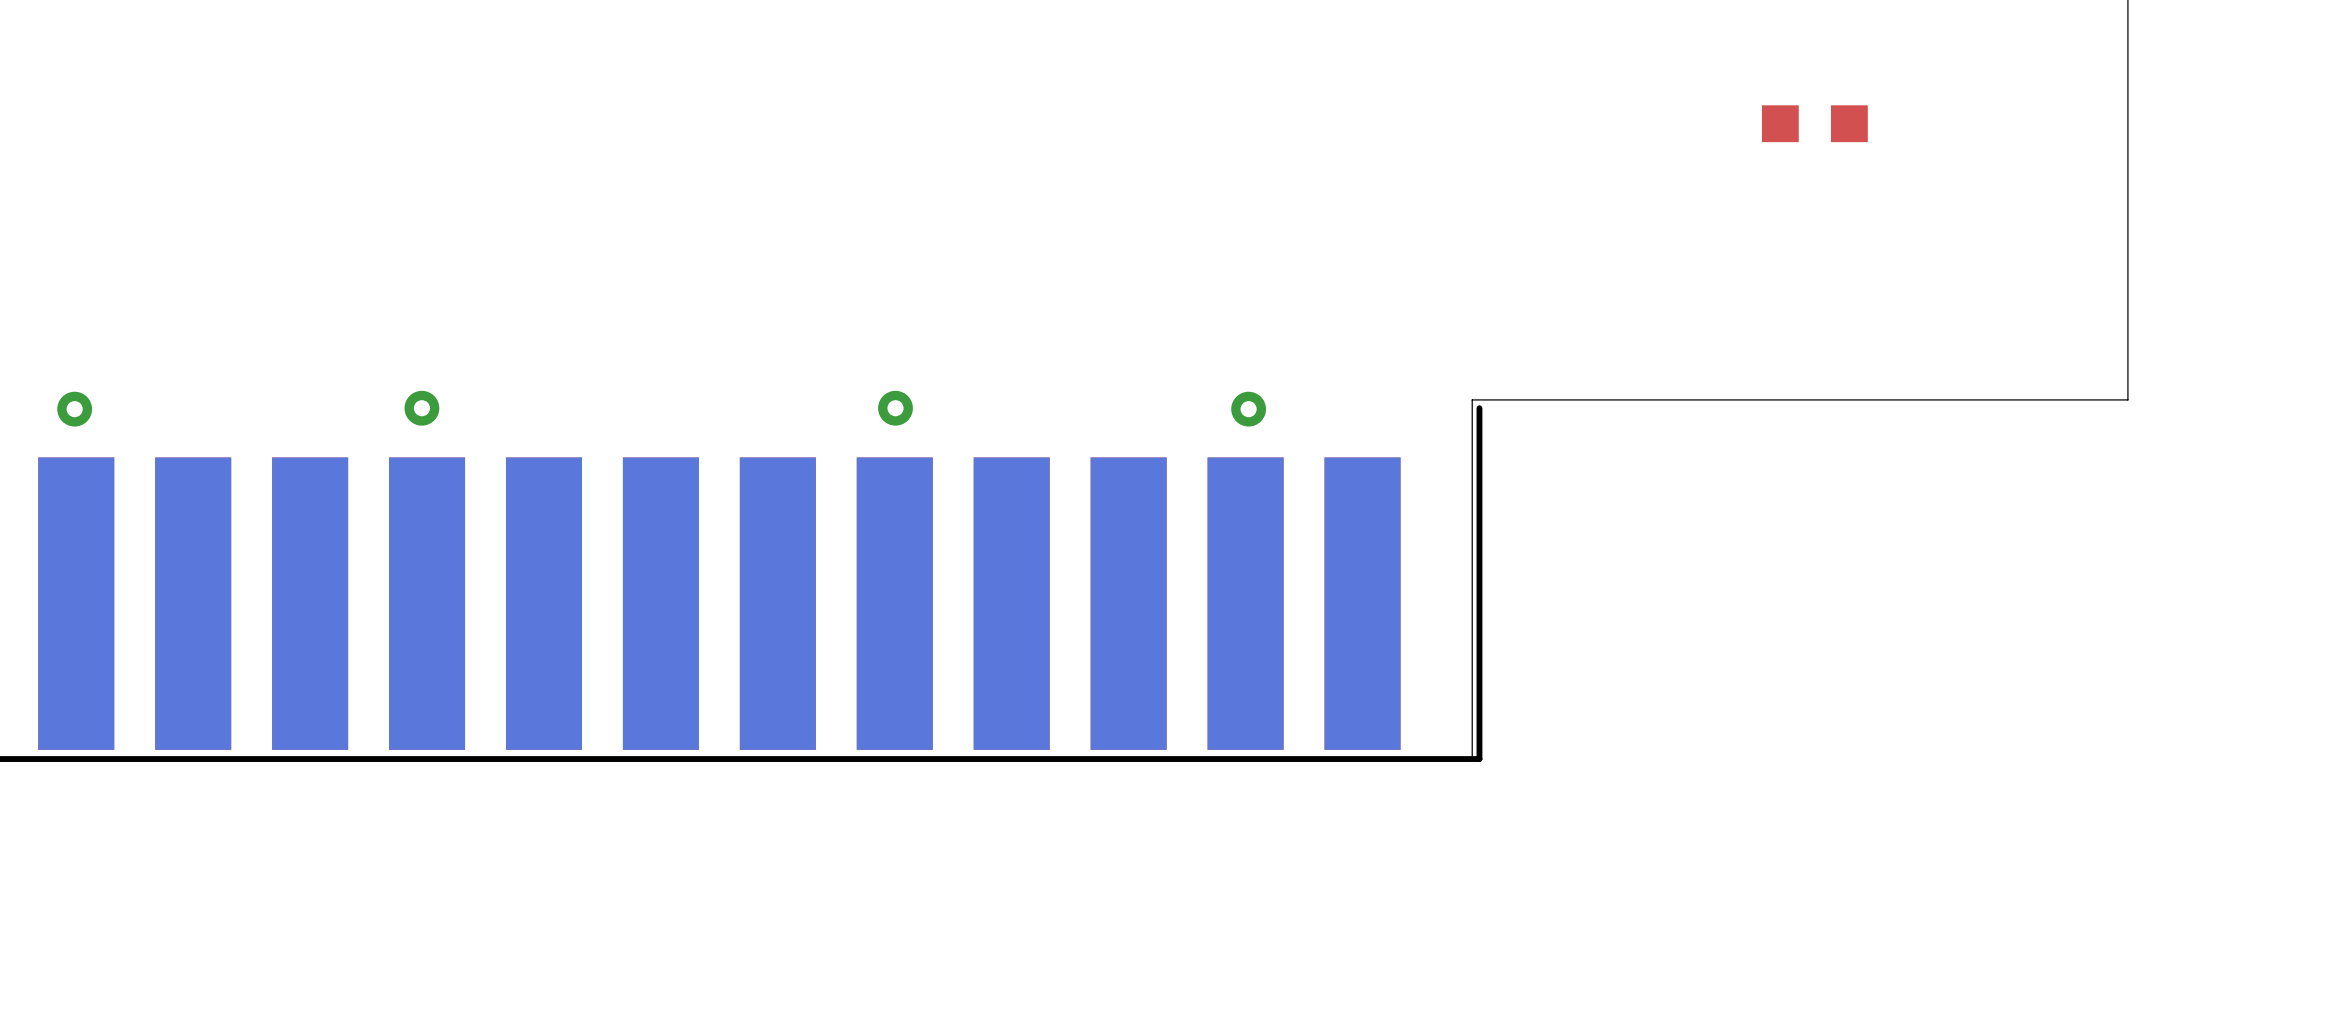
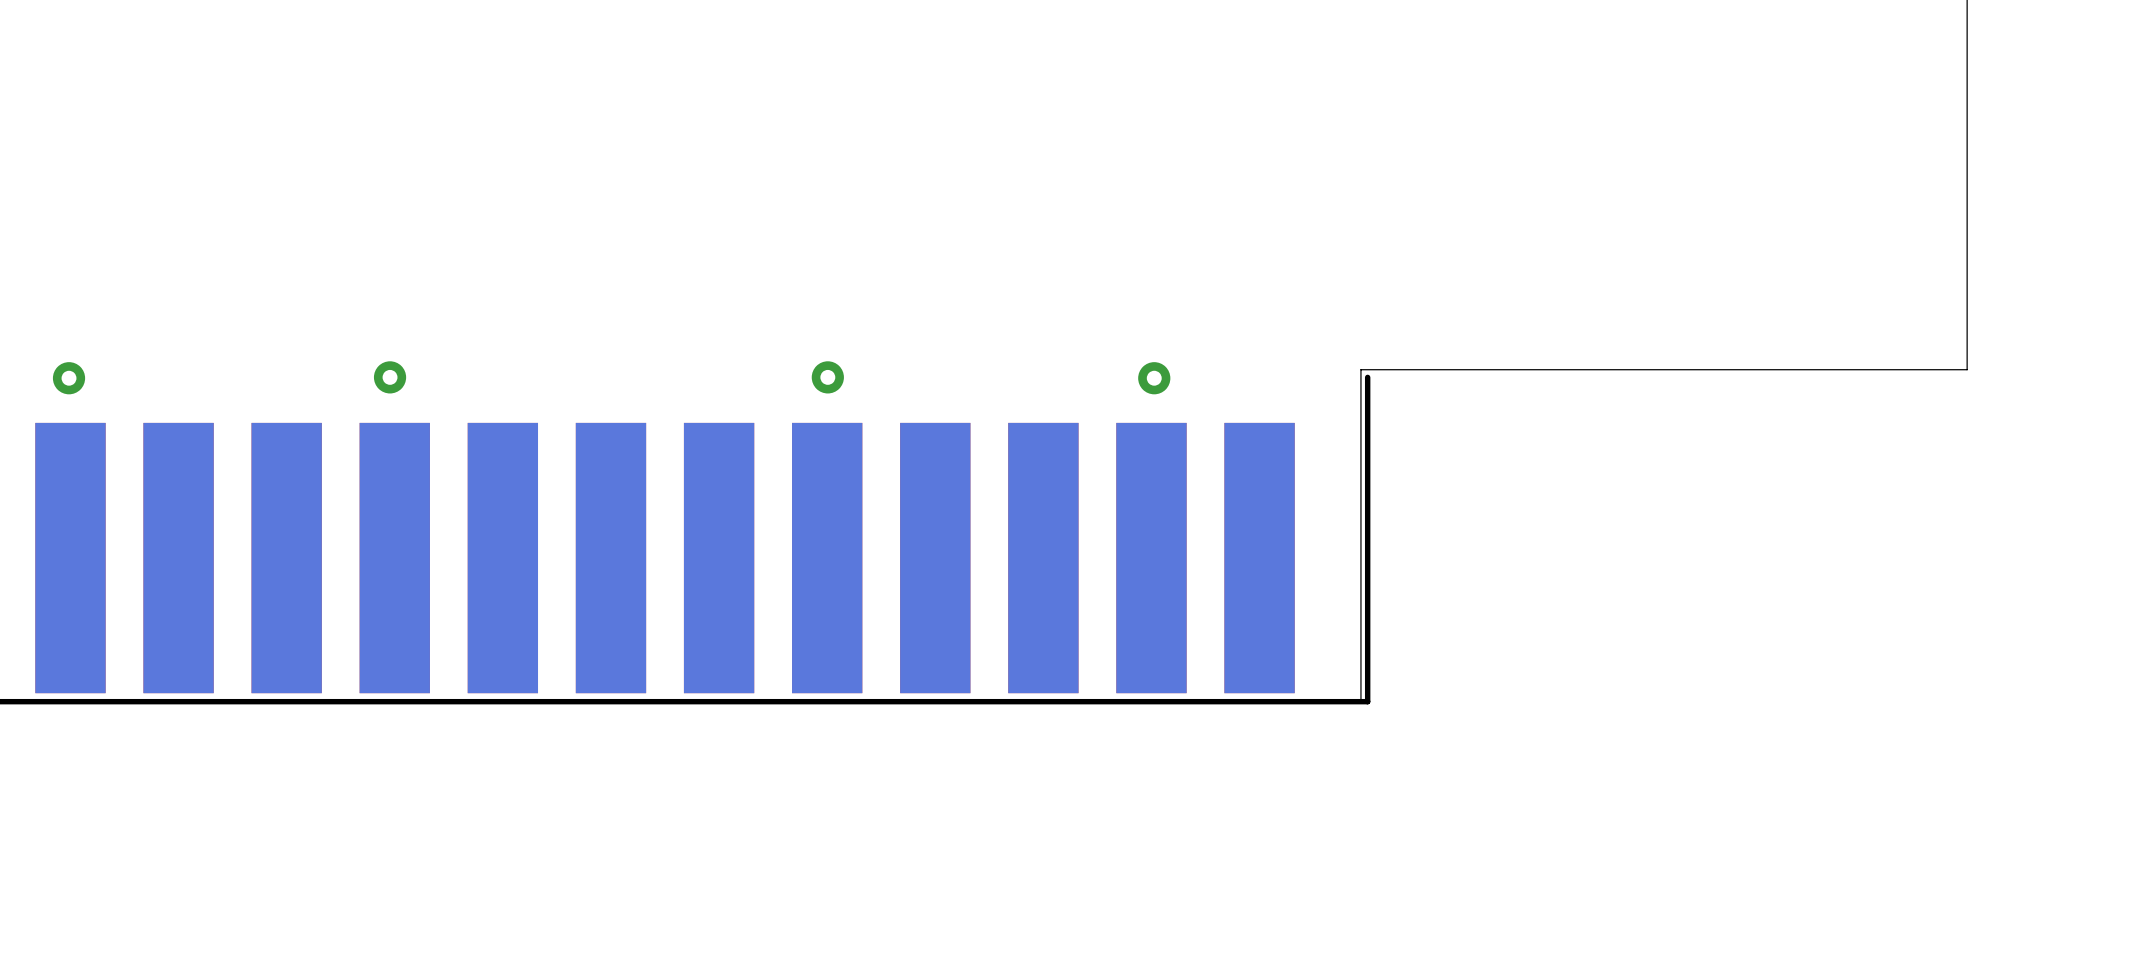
part: (1814, 123) -> none

